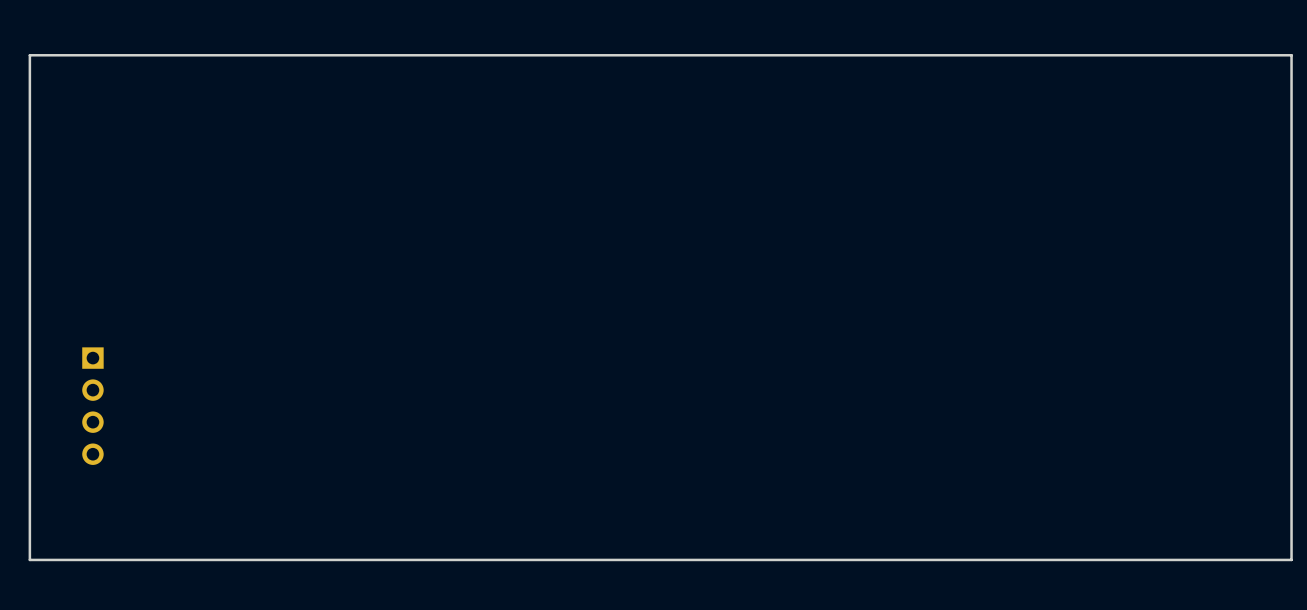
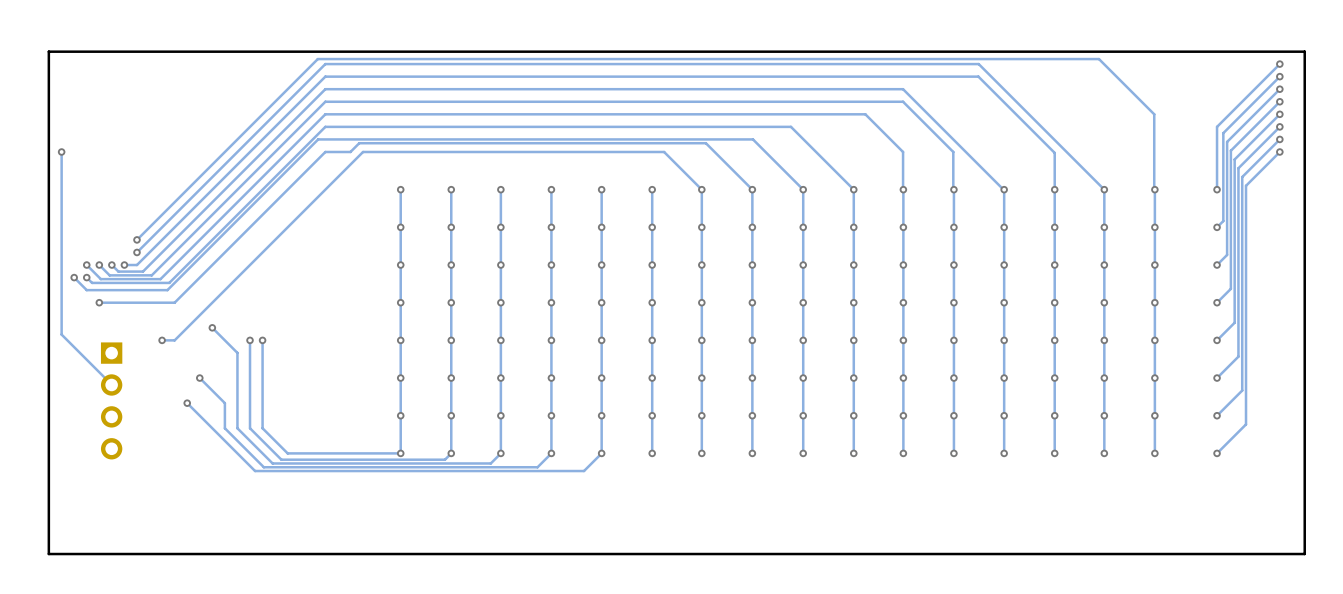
track: none -> (1279, 64) (1217, 126) (1217, 189)
via: none -> (1279, 64)
track: none -> (1279, 76) (1223, 133) (1223, 221) (1217, 227)
via: none -> (1279, 76)
track: none -> (1279, 89) (1227, 141) (1227, 254) (1217, 265)
via: none -> (1279, 89)
track: none -> (1279, 101) (1230, 150) (1230, 288) (1217, 302)
via: none -> (1279, 101)
track: none -> (1279, 114) (1234, 159) (1234, 322) (1217, 340)
via: none -> (1279, 114)
track: none -> (1279, 126) (1238, 168) (1238, 356) (1217, 378)
via: none -> (1279, 126)
track: none -> (1279, 139) (1242, 177) (1242, 390) (1217, 415)
via: none -> (1279, 139)
track: none -> (61, 151) (61, 334) (111, 384)
via: none -> (61, 151)
track: none -> (1279, 151) (1246, 185) (1246, 424) (1217, 453)
via: none -> (1279, 151)
track: none -> (400, 189) (400, 453) (287, 453) (262, 428) (262, 340)
via: none -> (400, 189)
track: none -> (451, 189) (451, 453) (444, 459) (281, 459) (250, 428) (250, 340)
via: none -> (451, 189)
track: none -> (500, 189) (500, 453) (490, 463) (272, 463) (237, 428) (237, 352) (212, 327)
via: none -> (500, 189)
track: none -> (551, 189) (551, 453) (537, 467) (263, 467) (224, 428) (224, 403) (199, 378)
via: none -> (551, 189)
track: none -> (601, 189) (601, 453) (584, 471) (255, 471) (187, 403)
via: none -> (601, 189)
track: none -> (652, 189) (652, 453)
via: none -> (652, 189)
via: none -> (701, 189)
via: none -> (752, 189)
via: none -> (803, 189)
via: none -> (853, 189)
via: none -> (903, 189)
via: none -> (953, 189)
via: none -> (1004, 189)
via: none -> (1054, 189)
via: none -> (1104, 189)
via: none -> (1154, 189)
via: none -> (1217, 189)
via: none -> (400, 227)
via: none -> (451, 227)
via: none -> (500, 227)
via: none -> (551, 227)
via: none -> (601, 227)
via: none -> (652, 227)
via: none -> (701, 227)
via: none -> (752, 227)
via: none -> (803, 227)
via: none -> (853, 227)
via: none -> (903, 227)
via: none -> (953, 227)
via: none -> (1004, 227)
via: none -> (1054, 227)
via: none -> (1104, 227)
via: none -> (1154, 227)
via: none -> (1217, 227)
track: none -> (136, 239) (317, 59) (1099, 59) (1154, 114) (1154, 453)
via: none -> (136, 239)
track: none -> (136, 252) (325, 64) (978, 64) (1104, 189) (1104, 453)
via: none -> (136, 252)
track: none -> (86, 265) (100, 279) (160, 279) (325, 114) (865, 114) (903, 151) (903, 453)
via: none -> (86, 265)
track: none -> (99, 265) (109, 275) (151, 275) (325, 101) (903, 101) (953, 151) (953, 453)
via: none -> (99, 265)
track: none -> (111, 265) (118, 271) (142, 271) (325, 89) (903, 89) (1004, 189) (1004, 453)
via: none -> (111, 265)
track: none -> (124, 265) (136, 265) (325, 76) (978, 76) (1054, 152) (1054, 453)
via: none -> (124, 265)
via: none -> (400, 265)
via: none -> (451, 265)
via: none -> (500, 265)
via: none -> (551, 265)
via: none -> (601, 265)
via: none -> (652, 265)
via: none -> (701, 265)
via: none -> (752, 265)
via: none -> (803, 265)
via: none -> (853, 265)
via: none -> (903, 265)
via: none -> (953, 265)
via: none -> (1004, 265)
via: none -> (1054, 265)
via: none -> (1104, 265)
via: none -> (1154, 265)
via: none -> (1217, 265)
track: none -> (74, 277) (86, 290) (167, 290) (318, 139) (752, 139) (803, 189) (803, 453)
via: none -> (74, 277)
track: none -> (86, 277) (92, 282) (169, 282) (325, 126) (790, 126) (853, 189) (853, 453)
via: none -> (86, 277)
track: none -> (99, 302) (174, 302) (325, 151) (350, 151) (359, 143) (705, 143) (752, 189) (752, 453)
via: none -> (99, 302)
via: none -> (400, 302)
via: none -> (451, 302)
via: none -> (500, 302)
via: none -> (551, 302)
via: none -> (601, 302)
via: none -> (652, 302)
via: none -> (701, 302)
via: none -> (752, 302)
via: none -> (803, 302)
via: none -> (853, 302)
via: none -> (903, 302)
via: none -> (953, 302)
via: none -> (1004, 302)
via: none -> (1054, 302)
via: none -> (1104, 302)
via: none -> (1154, 302)
via: none -> (1217, 302)
via: none -> (212, 327)
track: none -> (162, 340) (174, 340) (363, 151) (664, 151) (701, 189) (701, 453)
via: none -> (162, 340)
via: none -> (250, 340)
via: none -> (262, 340)
via: none -> (400, 340)
via: none -> (451, 340)
via: none -> (500, 340)
via: none -> (551, 340)
via: none -> (601, 340)
via: none -> (652, 340)
via: none -> (701, 340)
via: none -> (752, 340)
via: none -> (803, 340)
via: none -> (853, 340)
via: none -> (903, 340)
via: none -> (953, 340)
via: none -> (1004, 340)
via: none -> (1054, 340)
via: none -> (1104, 340)
via: none -> (1154, 340)
via: none -> (1217, 340)
via: none -> (199, 378)
via: none -> (400, 378)
via: none -> (451, 378)
via: none -> (500, 378)
via: none -> (551, 378)
via: none -> (601, 378)
via: none -> (652, 378)
via: none -> (701, 378)
via: none -> (752, 378)
via: none -> (803, 378)
via: none -> (853, 378)
via: none -> (903, 378)
via: none -> (953, 378)
via: none -> (1004, 378)
via: none -> (1054, 378)
via: none -> (1104, 378)
via: none -> (1154, 378)
via: none -> (1217, 378)
via: none -> (187, 403)
via: none -> (400, 415)
via: none -> (451, 415)
via: none -> (500, 415)
via: none -> (551, 415)
via: none -> (601, 415)
via: none -> (652, 415)
via: none -> (701, 415)
via: none -> (752, 415)
via: none -> (803, 415)
via: none -> (853, 415)
via: none -> (903, 415)
via: none -> (953, 415)
via: none -> (1004, 415)
via: none -> (1054, 415)
via: none -> (1104, 415)
via: none -> (1154, 415)
via: none -> (1217, 415)
via: none -> (400, 453)
via: none -> (451, 453)
via: none -> (500, 453)
via: none -> (551, 453)
via: none -> (601, 453)
via: none -> (652, 453)
via: none -> (701, 453)
via: none -> (752, 453)
via: none -> (803, 453)
via: none -> (853, 453)
via: none -> (903, 453)
via: none -> (953, 453)
via: none -> (1004, 453)
via: none -> (1054, 453)
via: none -> (1104, 453)
via: none -> (1154, 453)
via: none -> (1217, 453)

